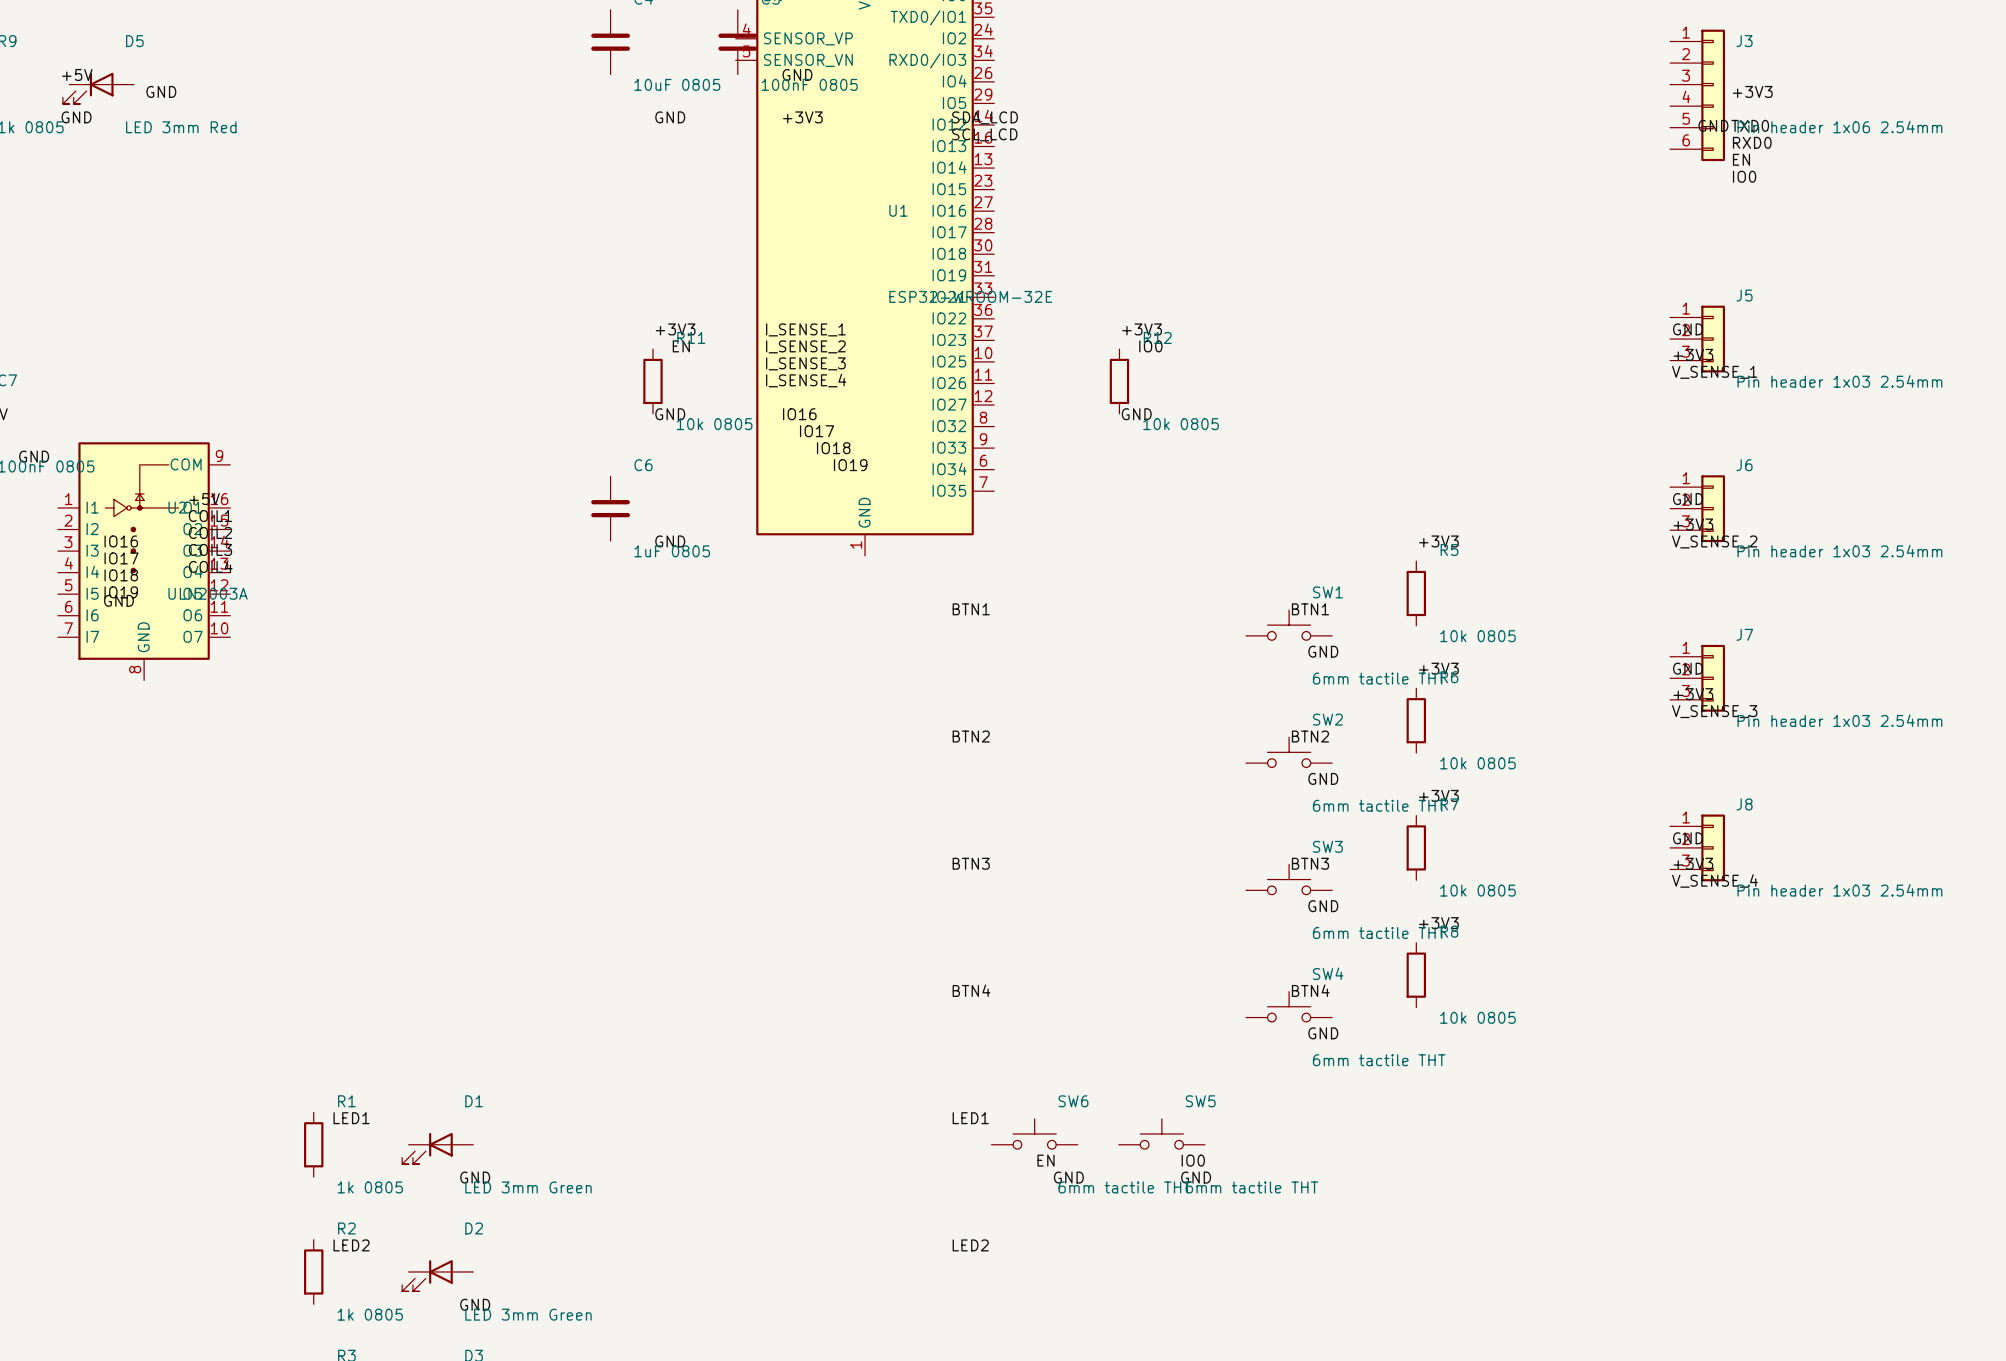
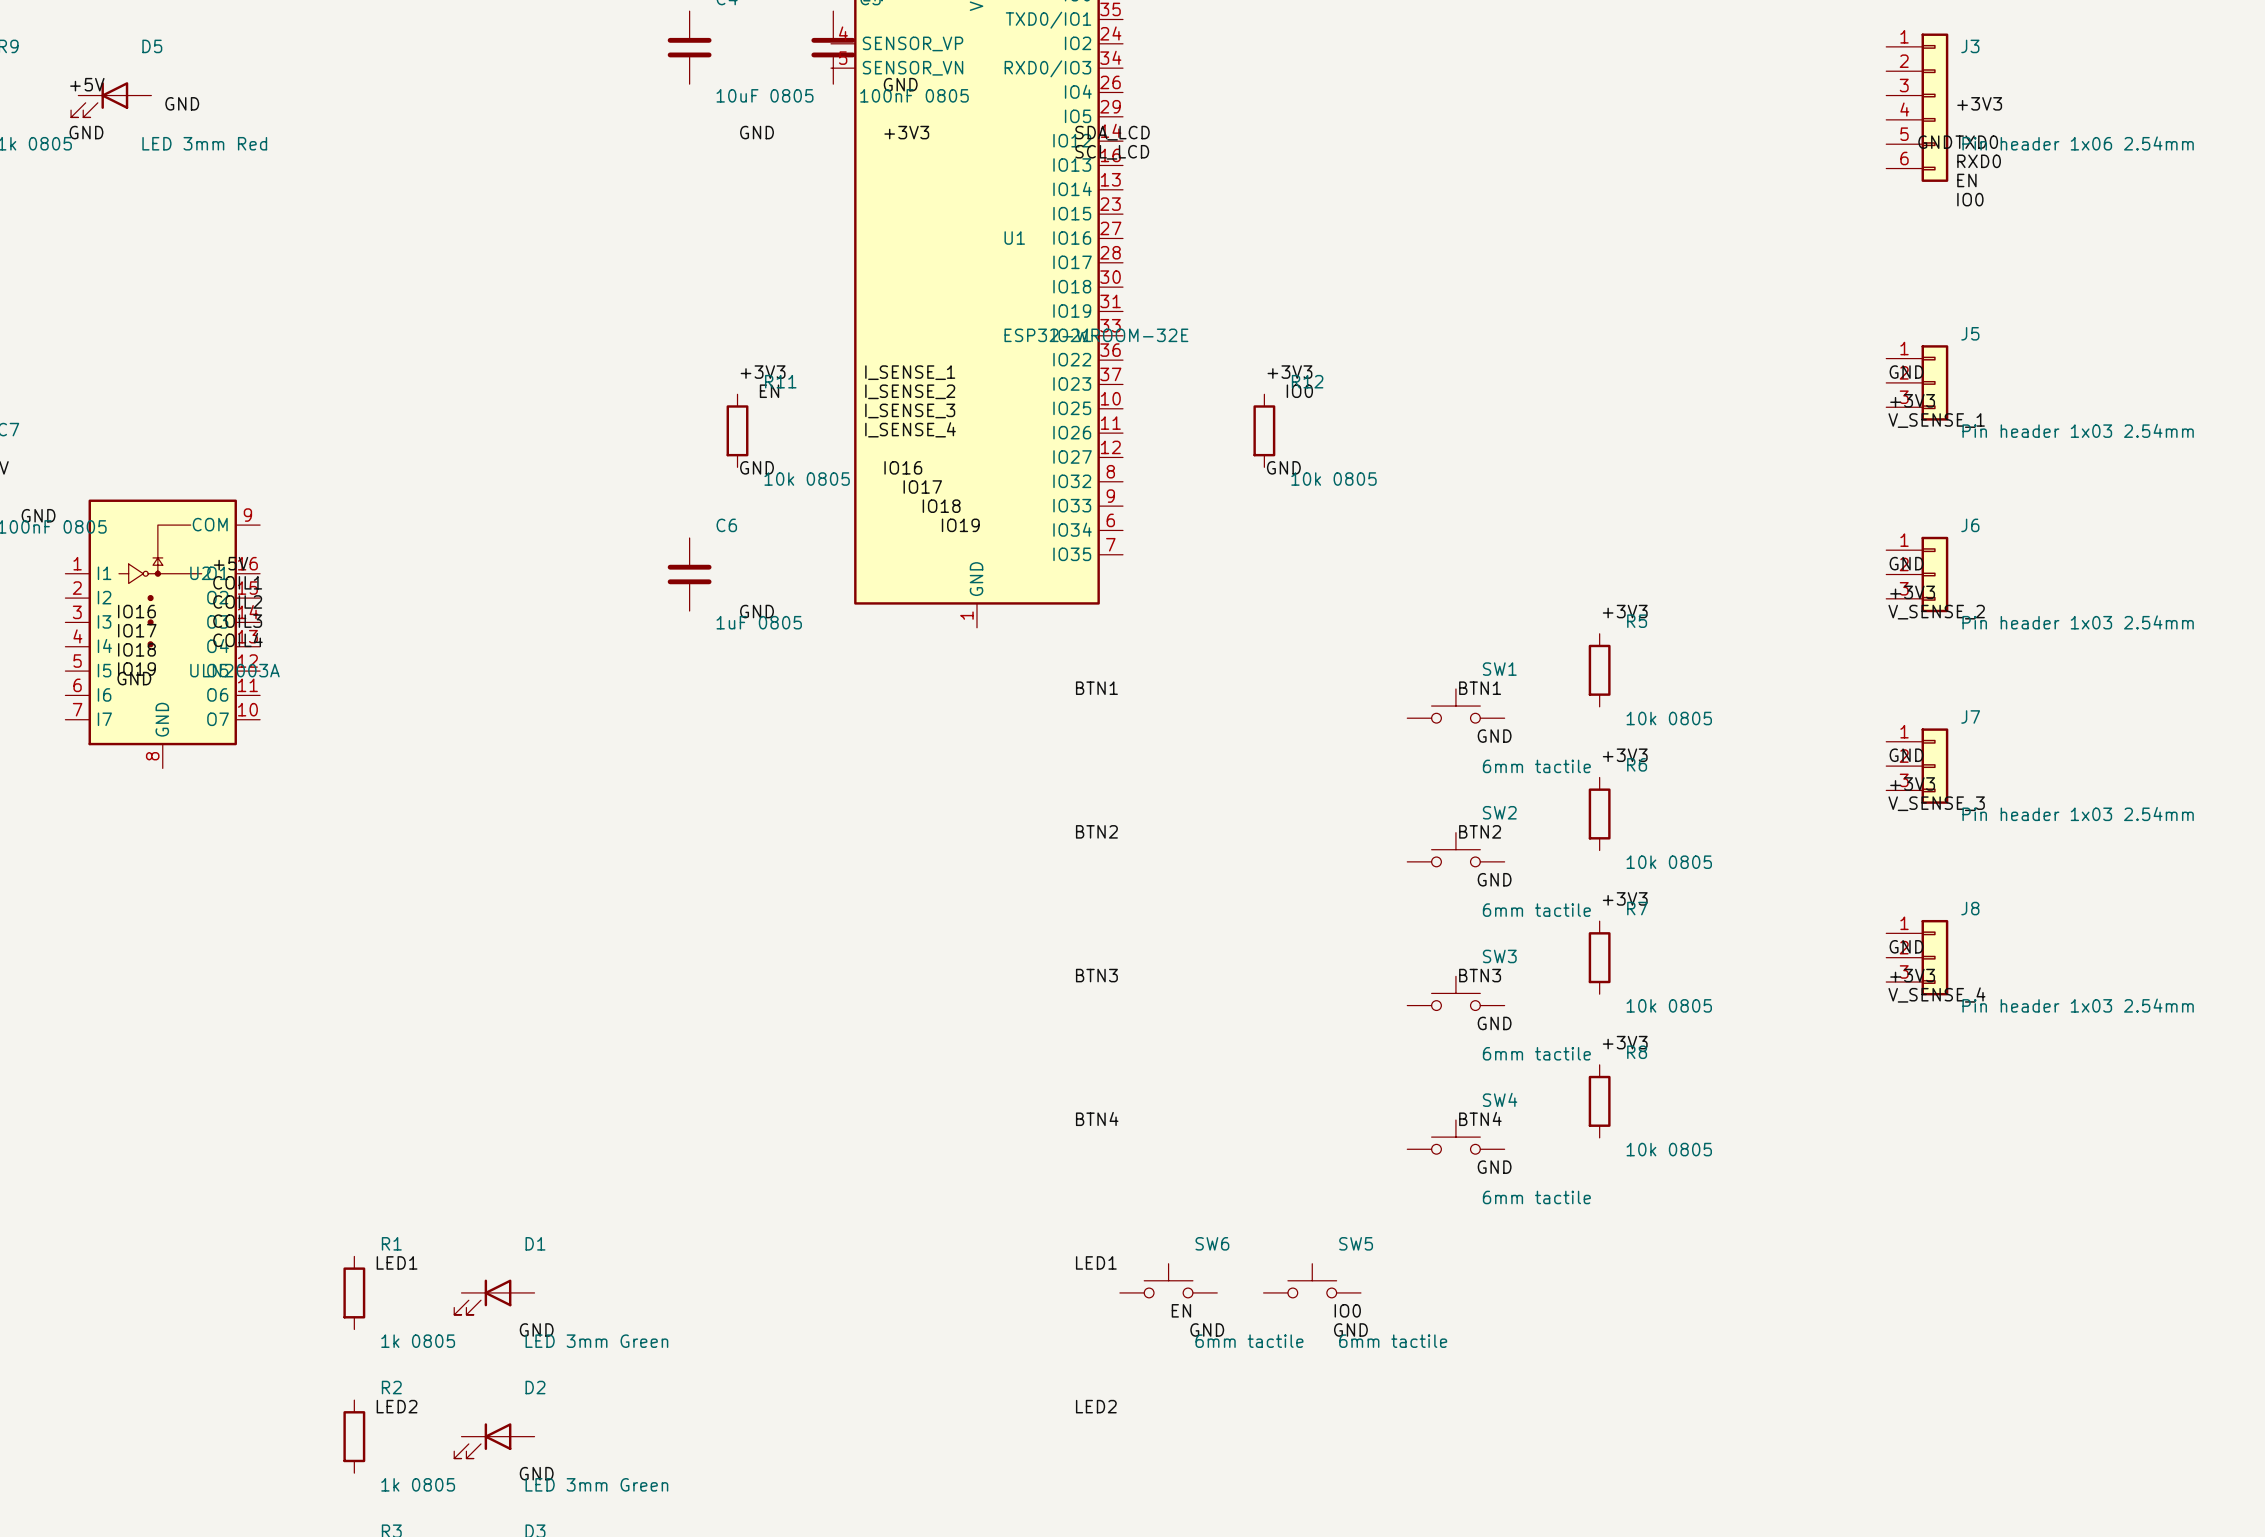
SW1 value: 6mm tactile THT (1379, 678) -> 6mm tactile (1536, 766)
SW2 value: 6mm tactile THT (1379, 805) -> 6mm tactile (1536, 910)
SW3 value: 6mm tactile THT (1379, 933) -> 6mm tactile (1536, 1053)
SW4 value: 6mm tactile THT (1379, 1060) -> 6mm tactile (1536, 1197)
SW6 value: 6mm tactile THT (1124, 1187) -> 6mm tactile (1249, 1341)
SW5 value: 6mm tactile THT (1251, 1187) -> 6mm tactile (1393, 1341)

